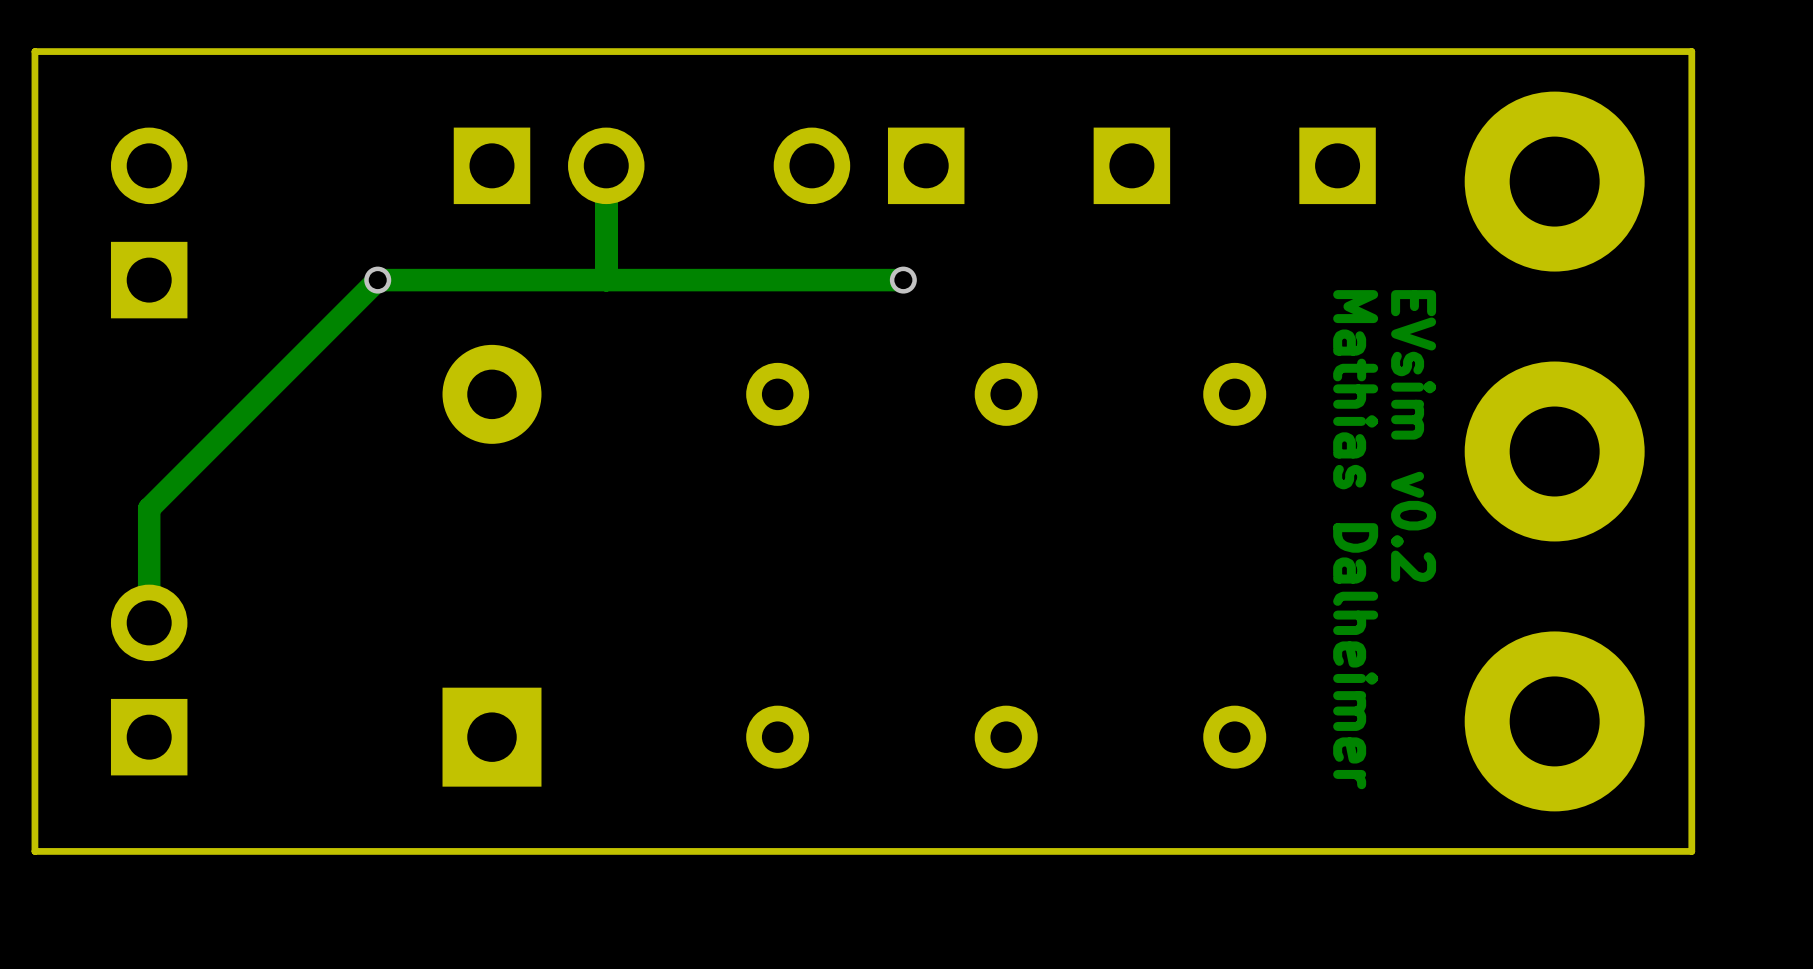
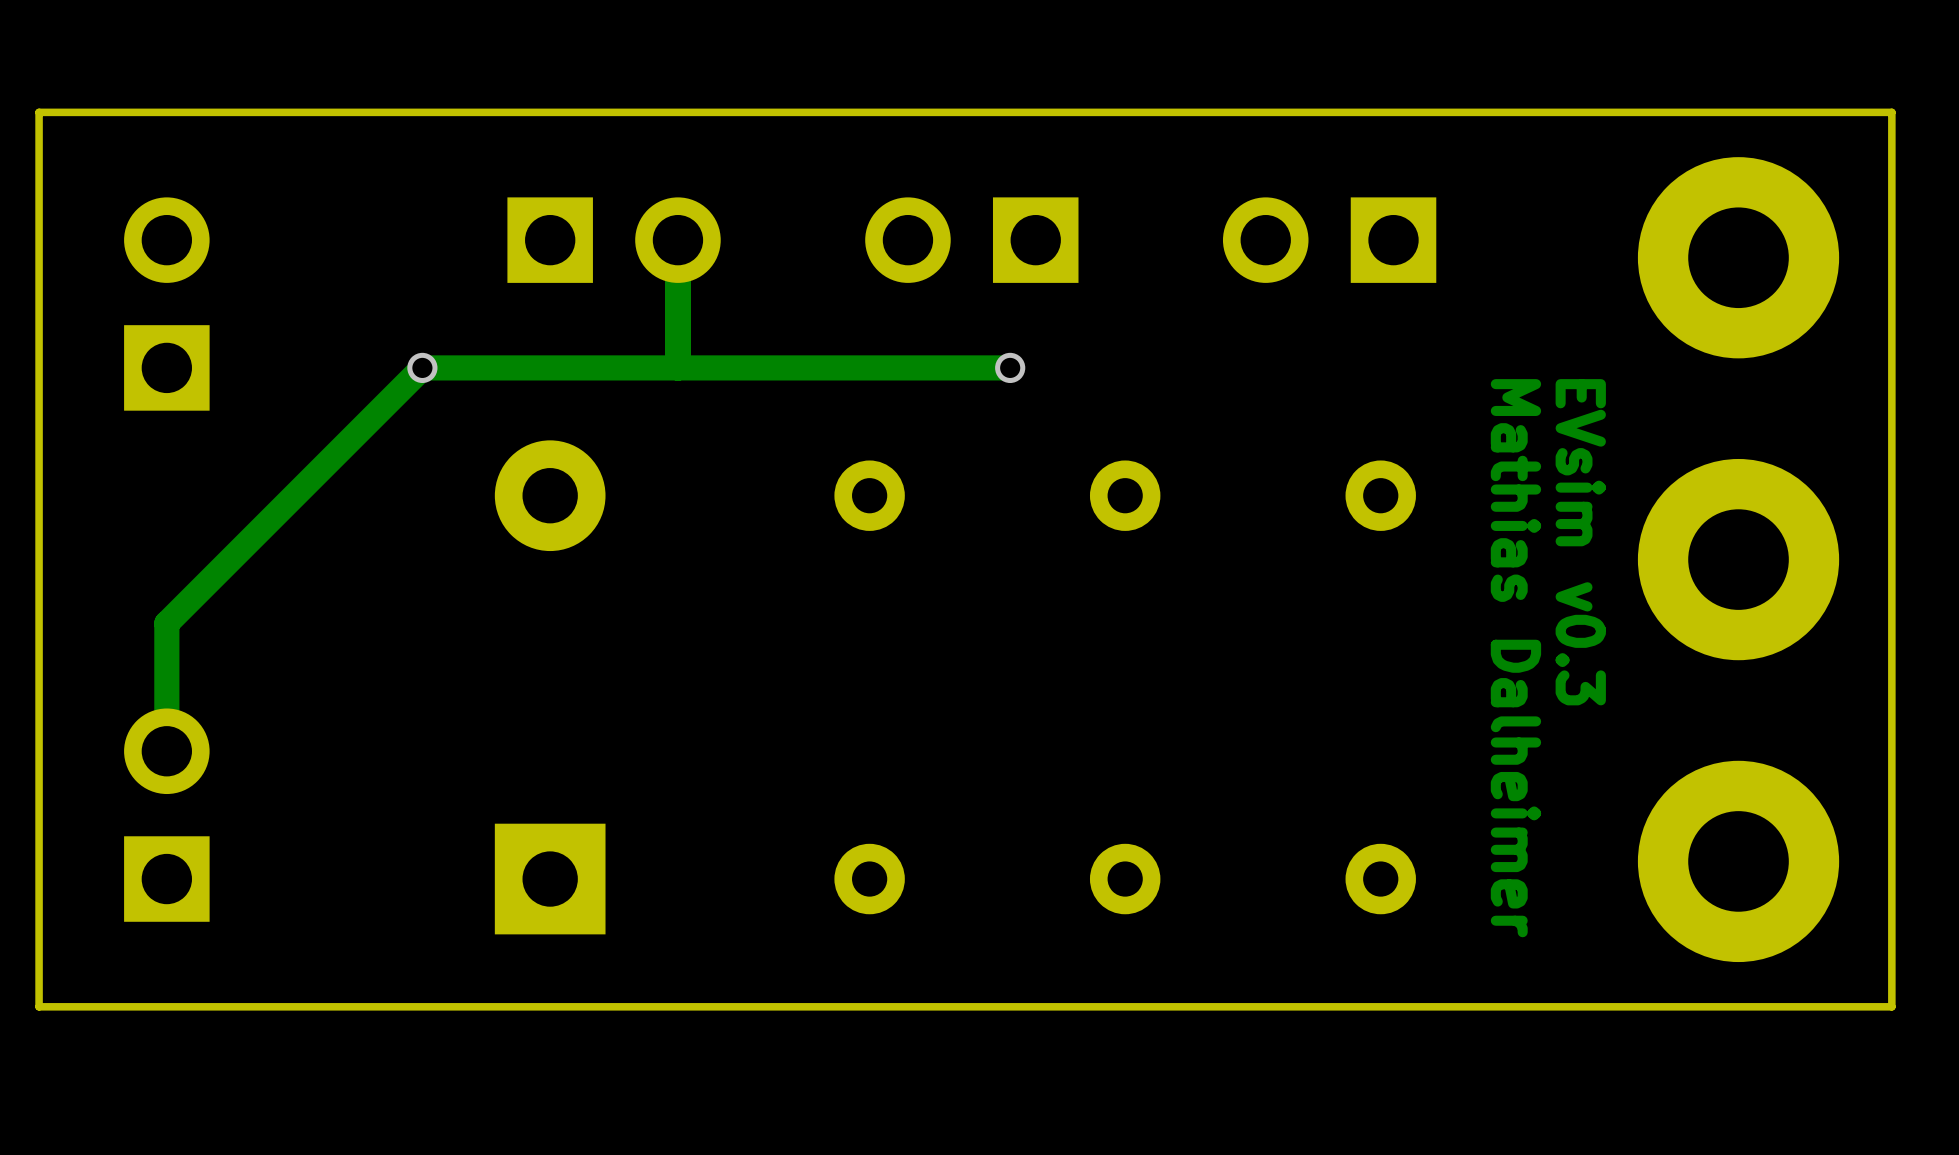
part: (1131, 165) -> none
part: none -> (1329, 240)
part: (1337, 165) -> none
text: EVsim v0.2 (1413, 435) -> EVsim v0.3 (1580, 542)

